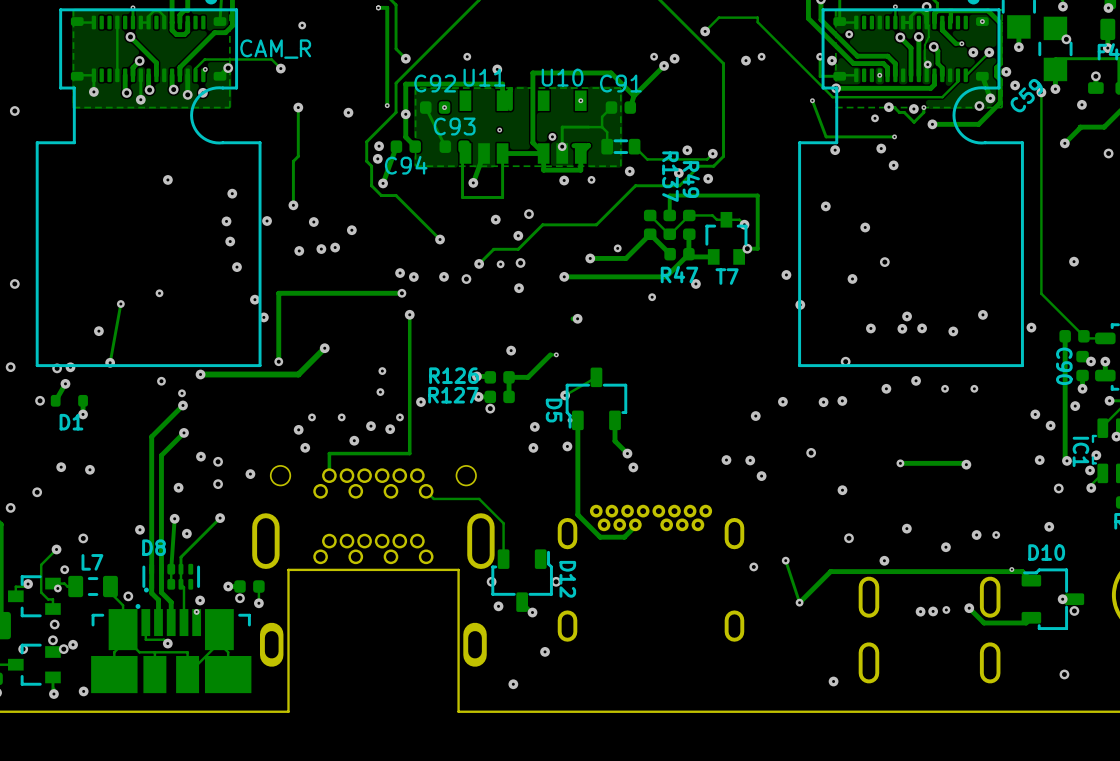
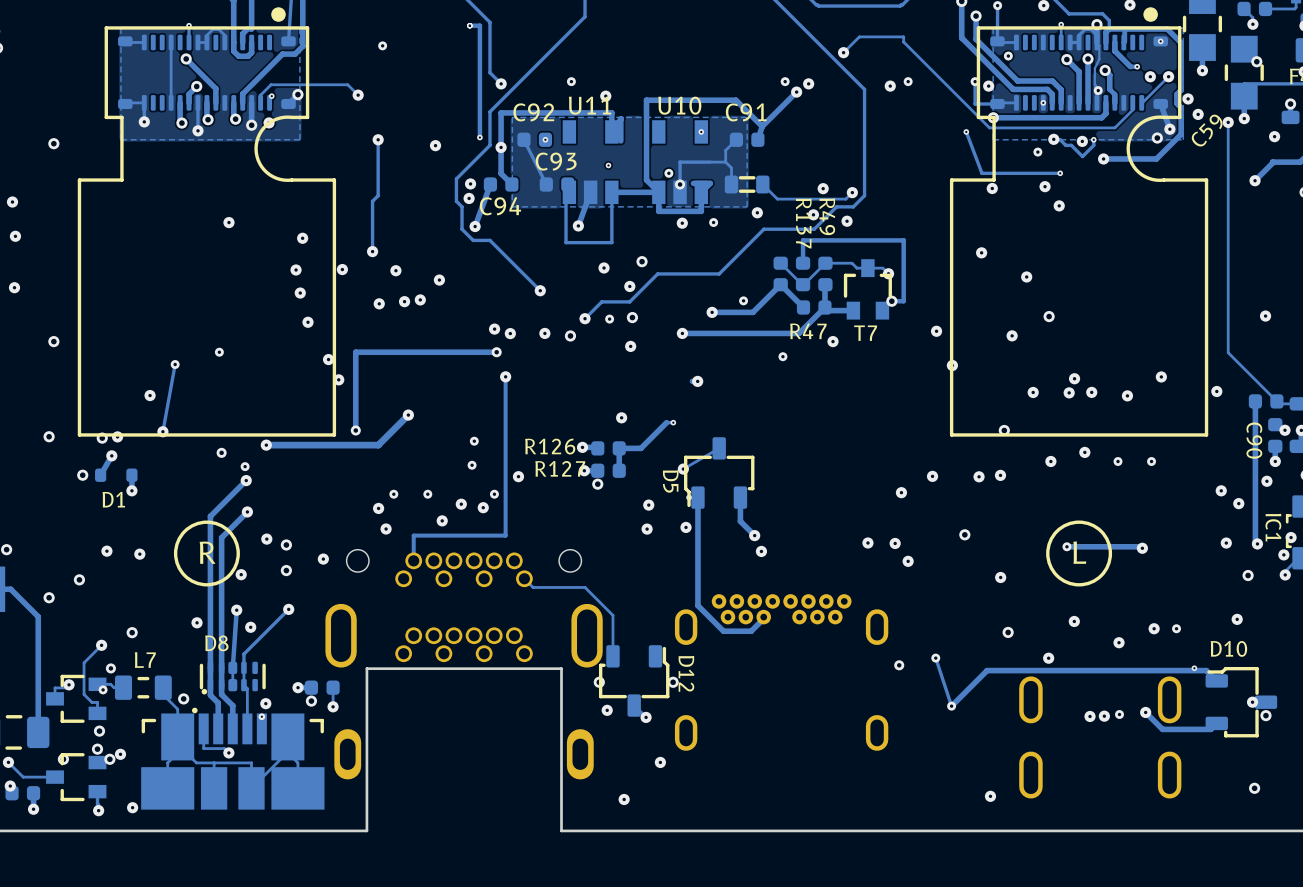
CAM_R name: CAM_R (275, 49) -> none
drawing: none -> [173, 520, 240, 587]
drawing: none -> [1046, 520, 1113, 587]
text: none -> R (207, 552)
text: none -> L (1079, 552)

